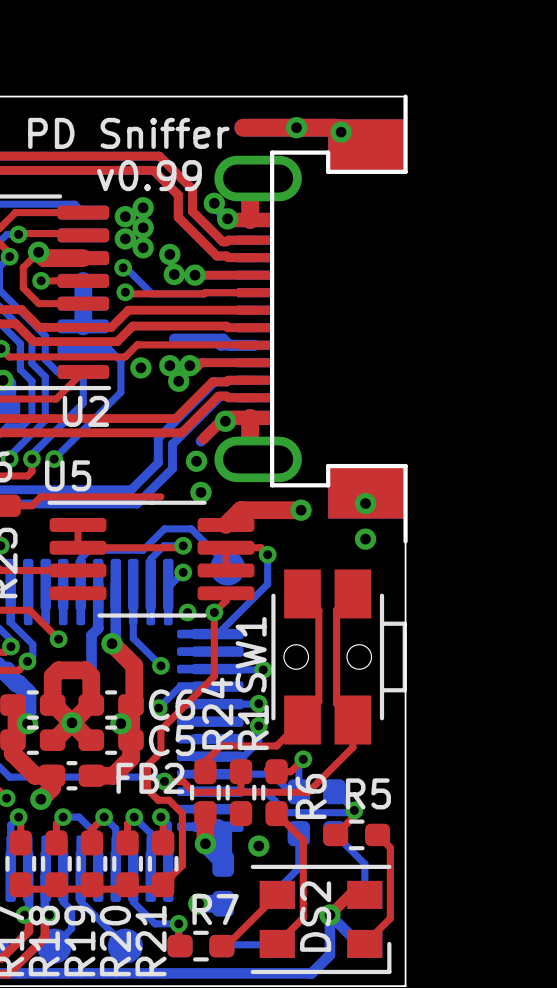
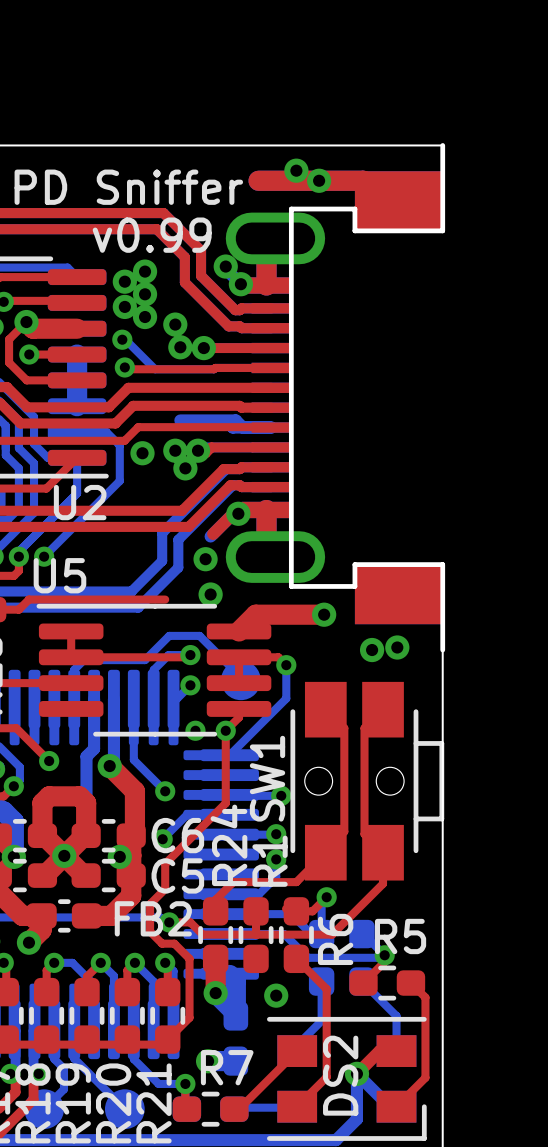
via position: (341, 132) -> (296, 170)
via position: (365, 503) -> (372, 650)

